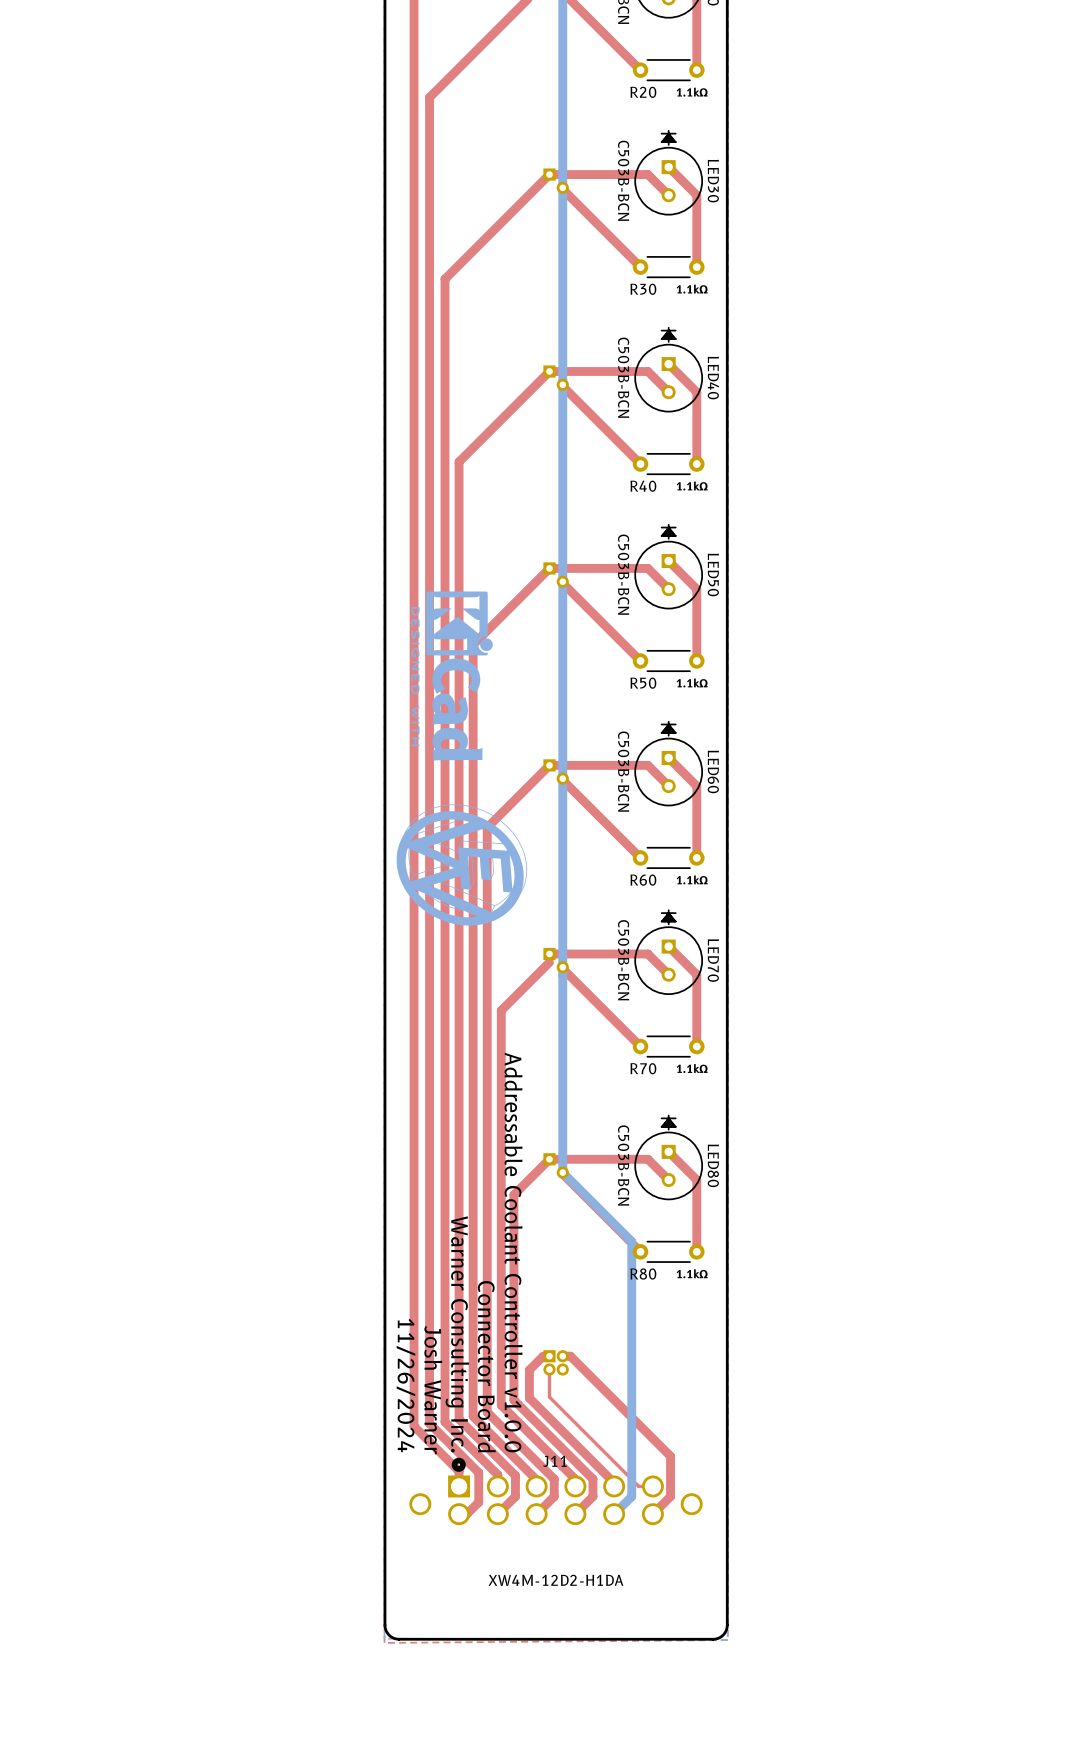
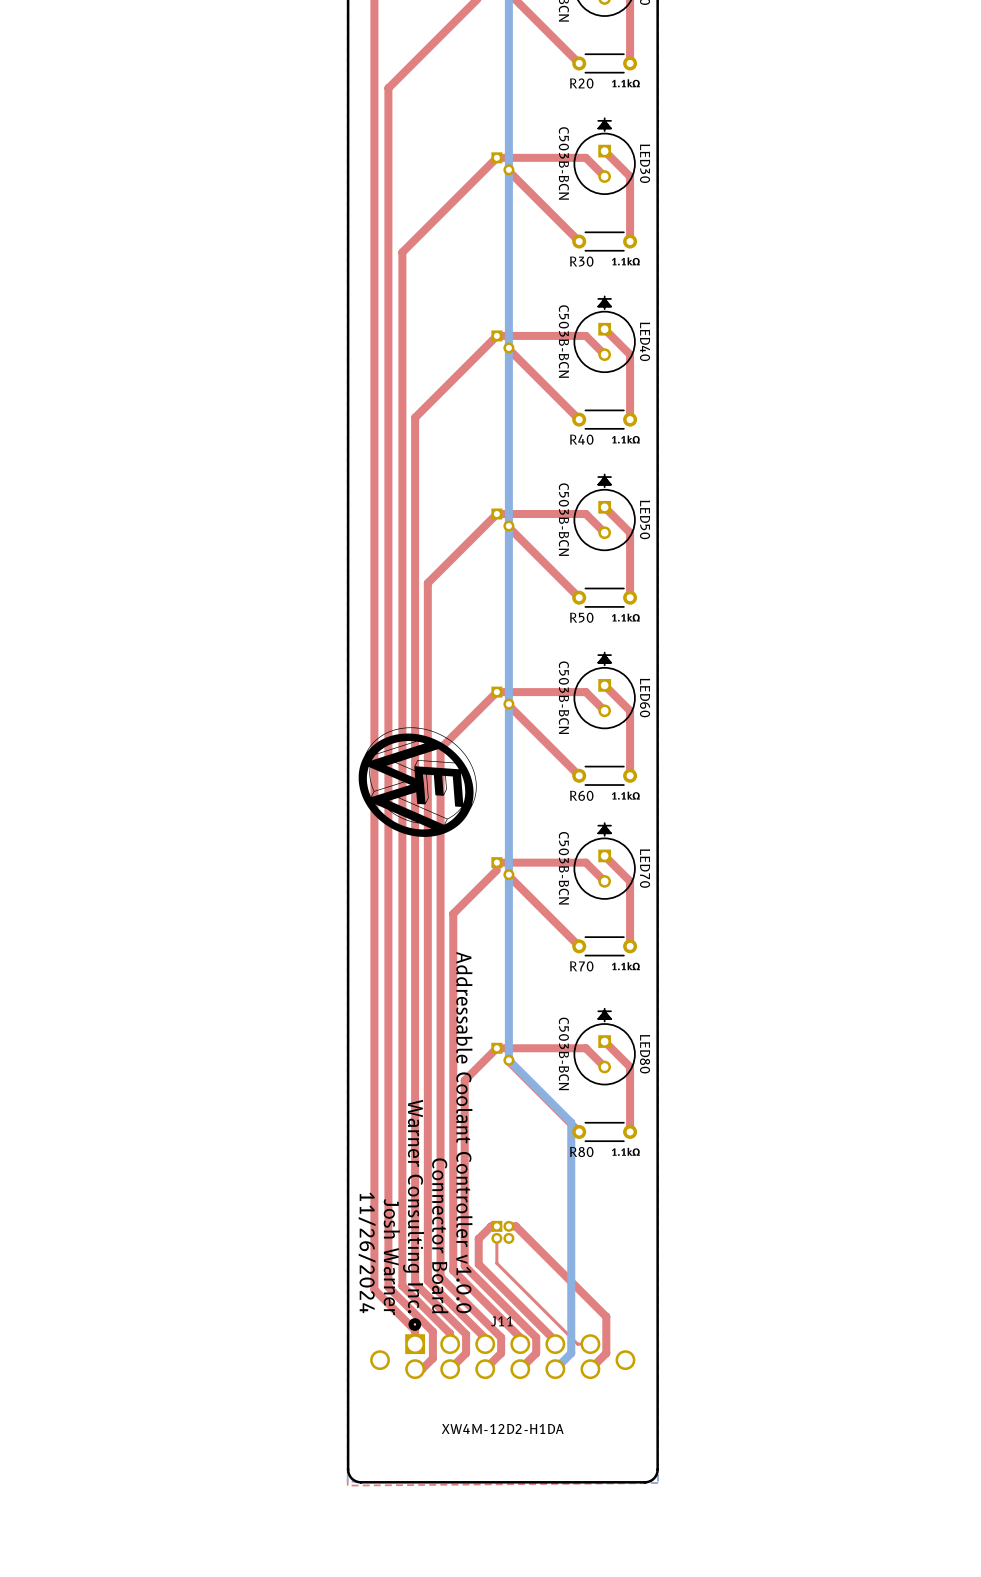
drawing: [411, 591, 493, 762] -> none
drawing shape: [396, 804, 528, 926] -> [358, 727, 477, 837]

